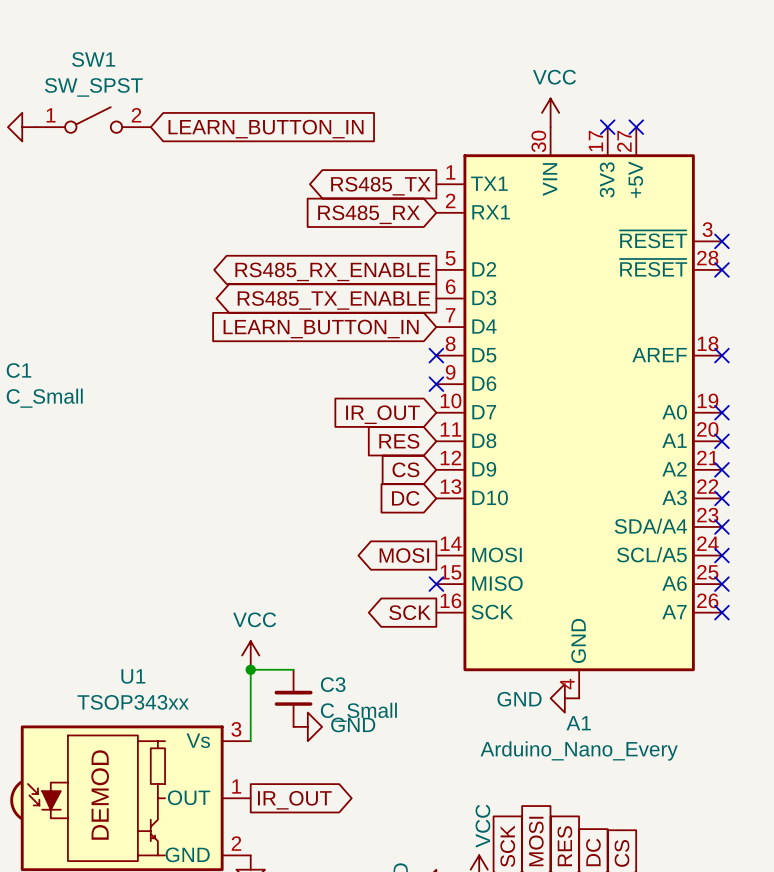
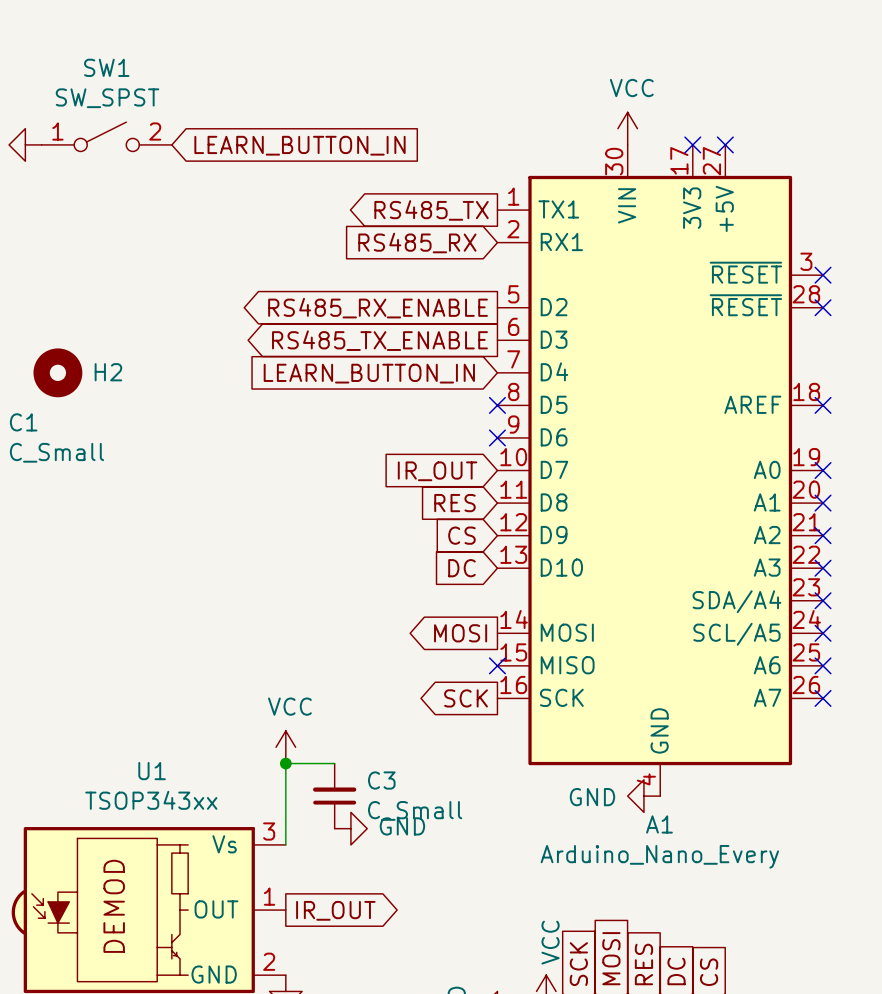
H2: none -> (57, 372)

